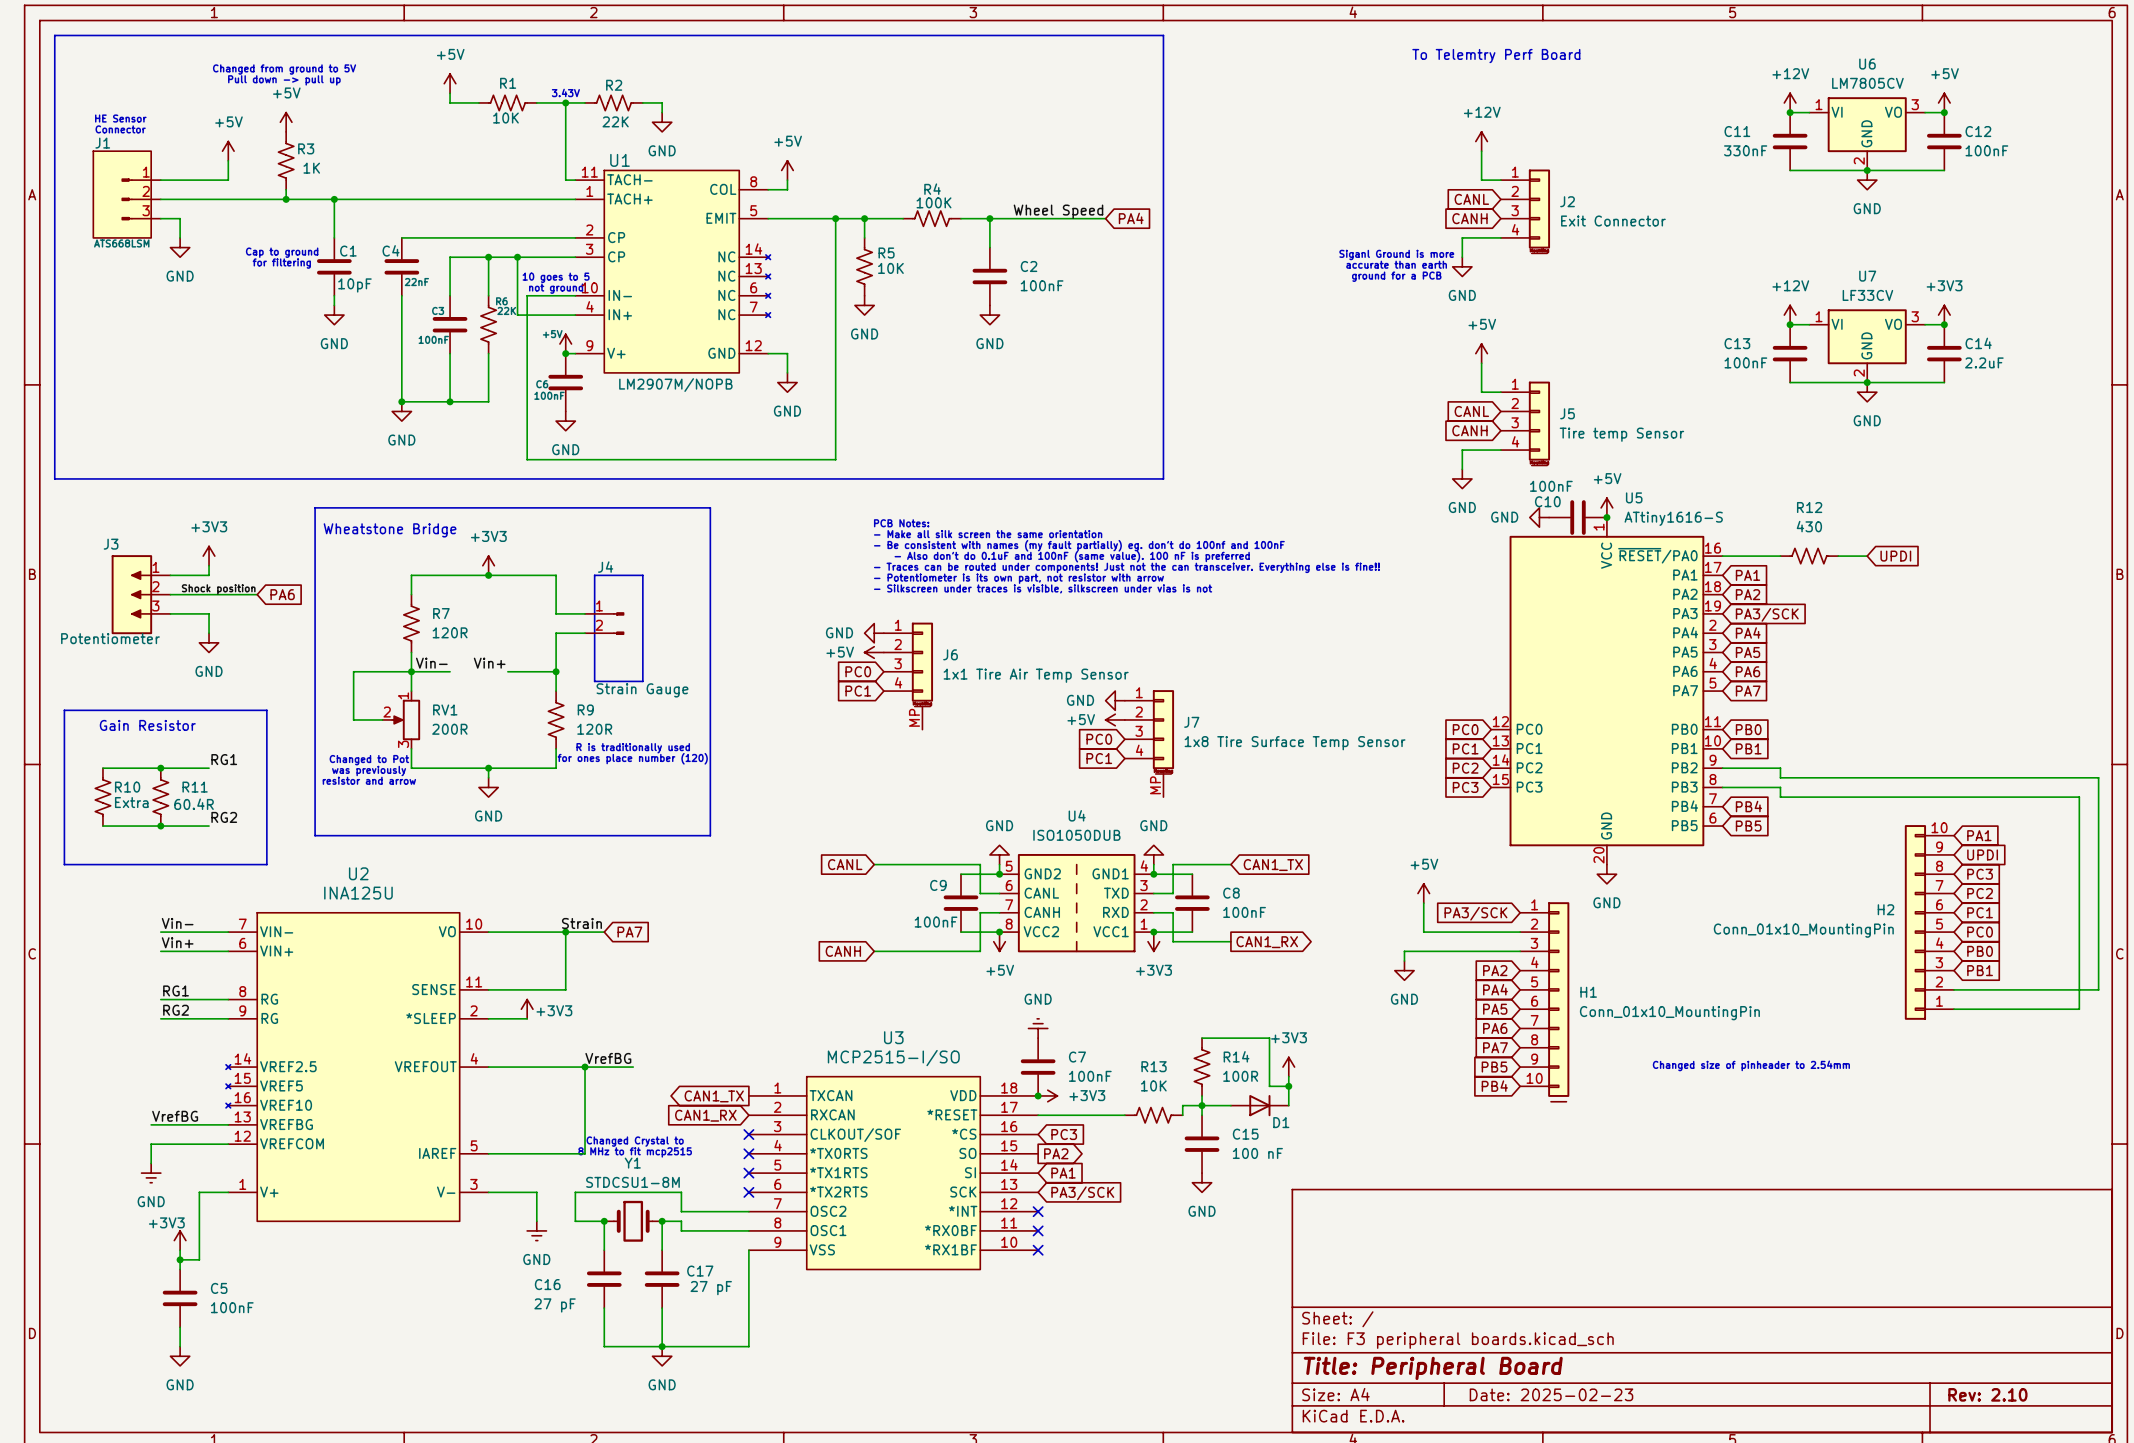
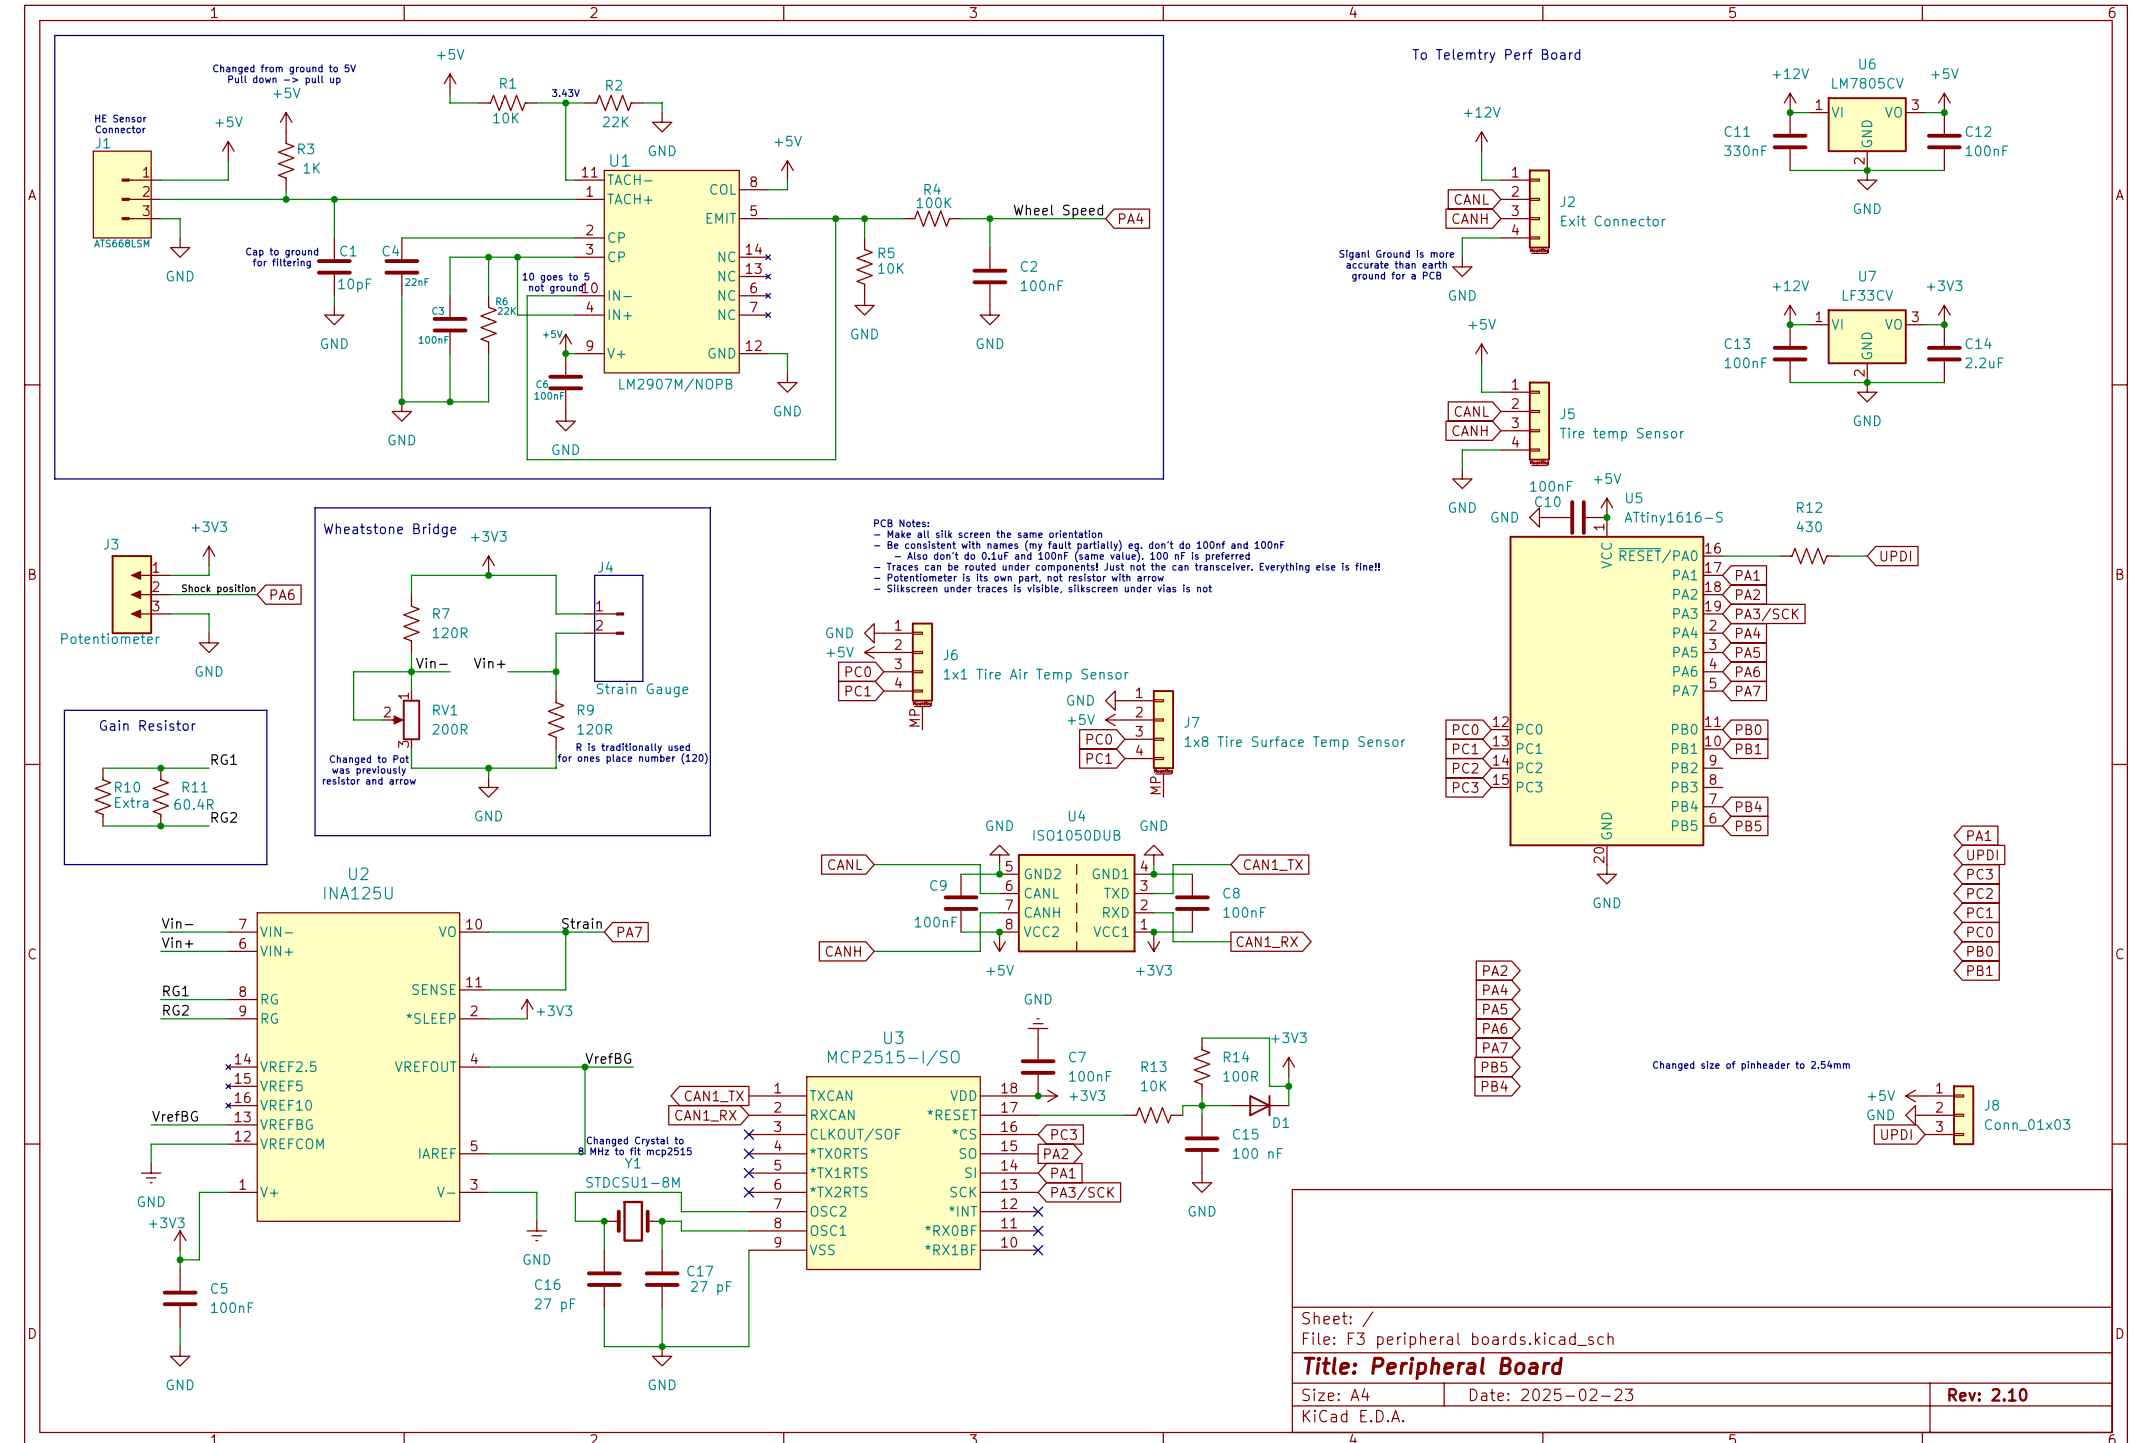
wire: (1722, 768) (1780, 768) (1780, 777) (2098, 777) (2098, 989) (1954, 989) -> none
wire: (1722, 787) (1780, 787) (1780, 797) (2079, 797) (2079, 1009) (1954, 1009) -> none
power symbol: +5V (1423, 893) -> none
wire: (1423, 903) (1423, 932) (1520, 932) -> none
global label: PA3/SCK (1475, 913) -> none
H2: Conn_01x10_MountingPin (1929, 922) -> none
wire: (1520, 951) (1404, 951) (1404, 961) -> none
power symbol: GND (1404, 970) -> none
H1: Conn_01x10_MountingPin (1544, 1002) -> none
power symbol: none -> +5V (1915, 1095)
power symbol: none -> GND (1915, 1115)
J8: none -> Conn_01x03 (1949, 1115)
global label: none -> UPDI (1896, 1134)

